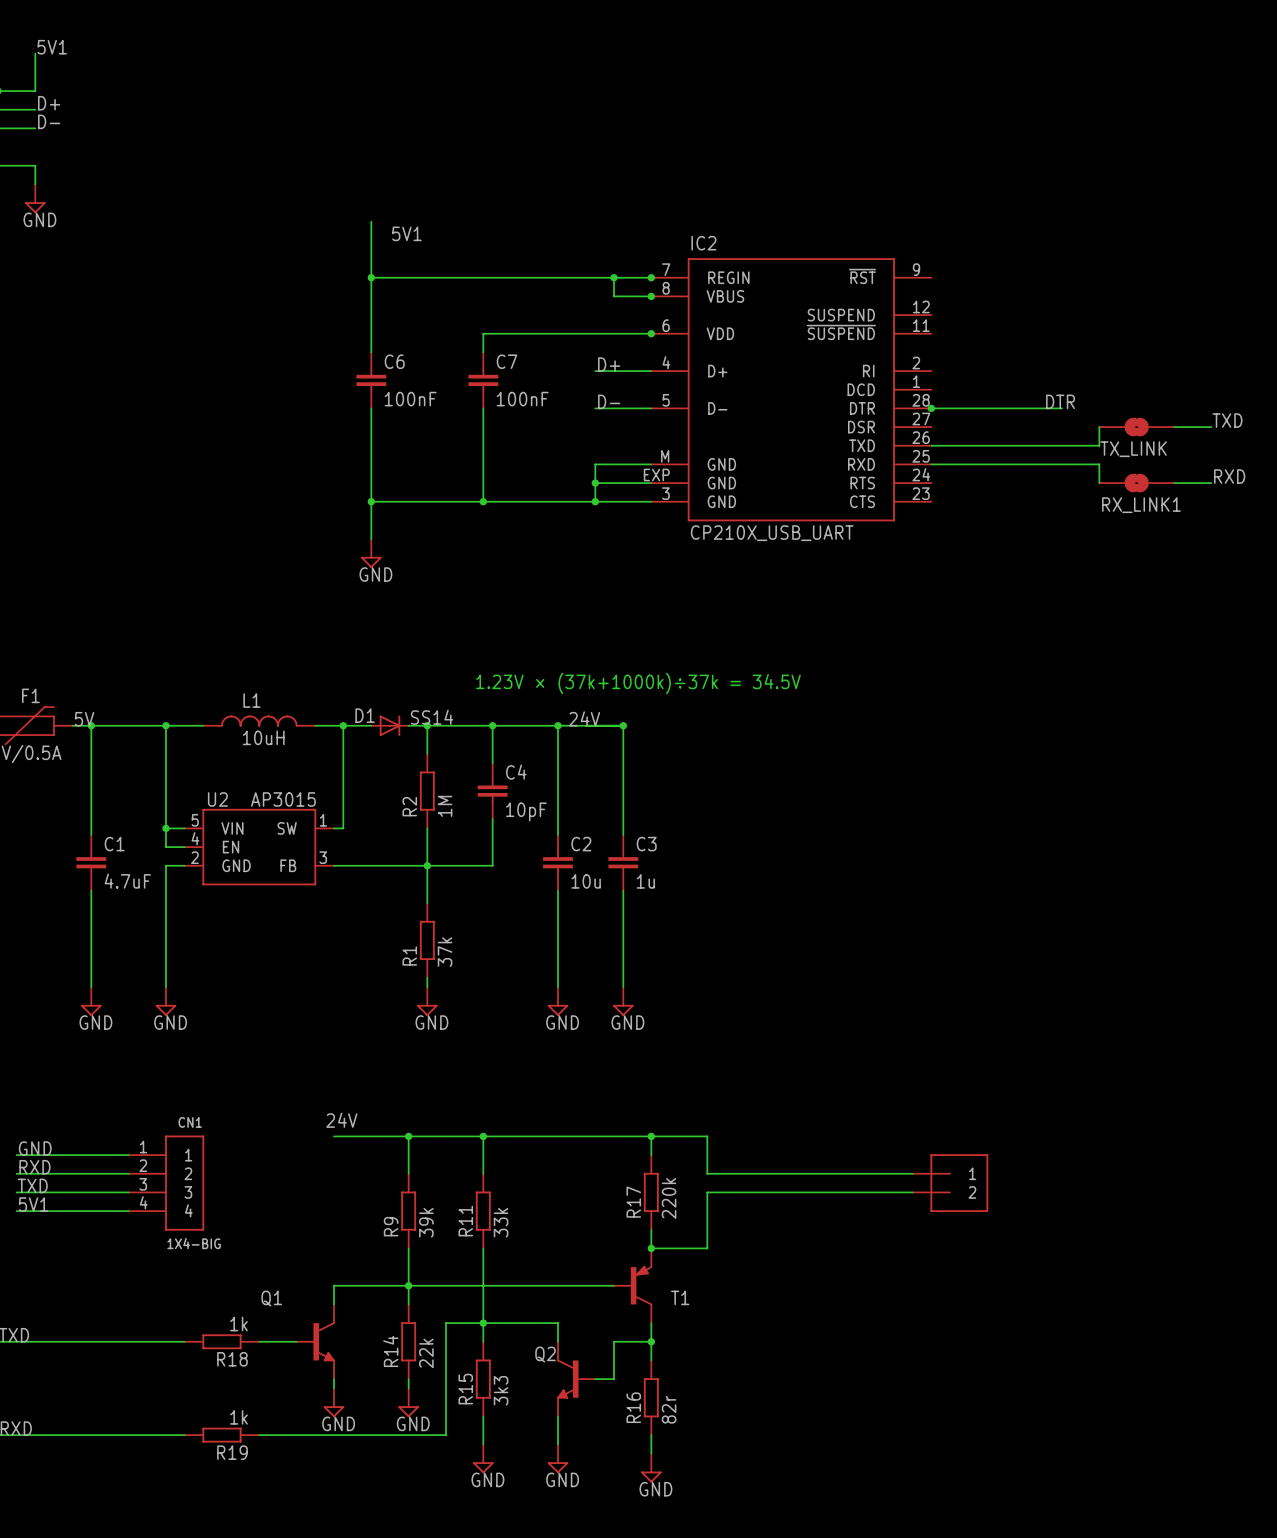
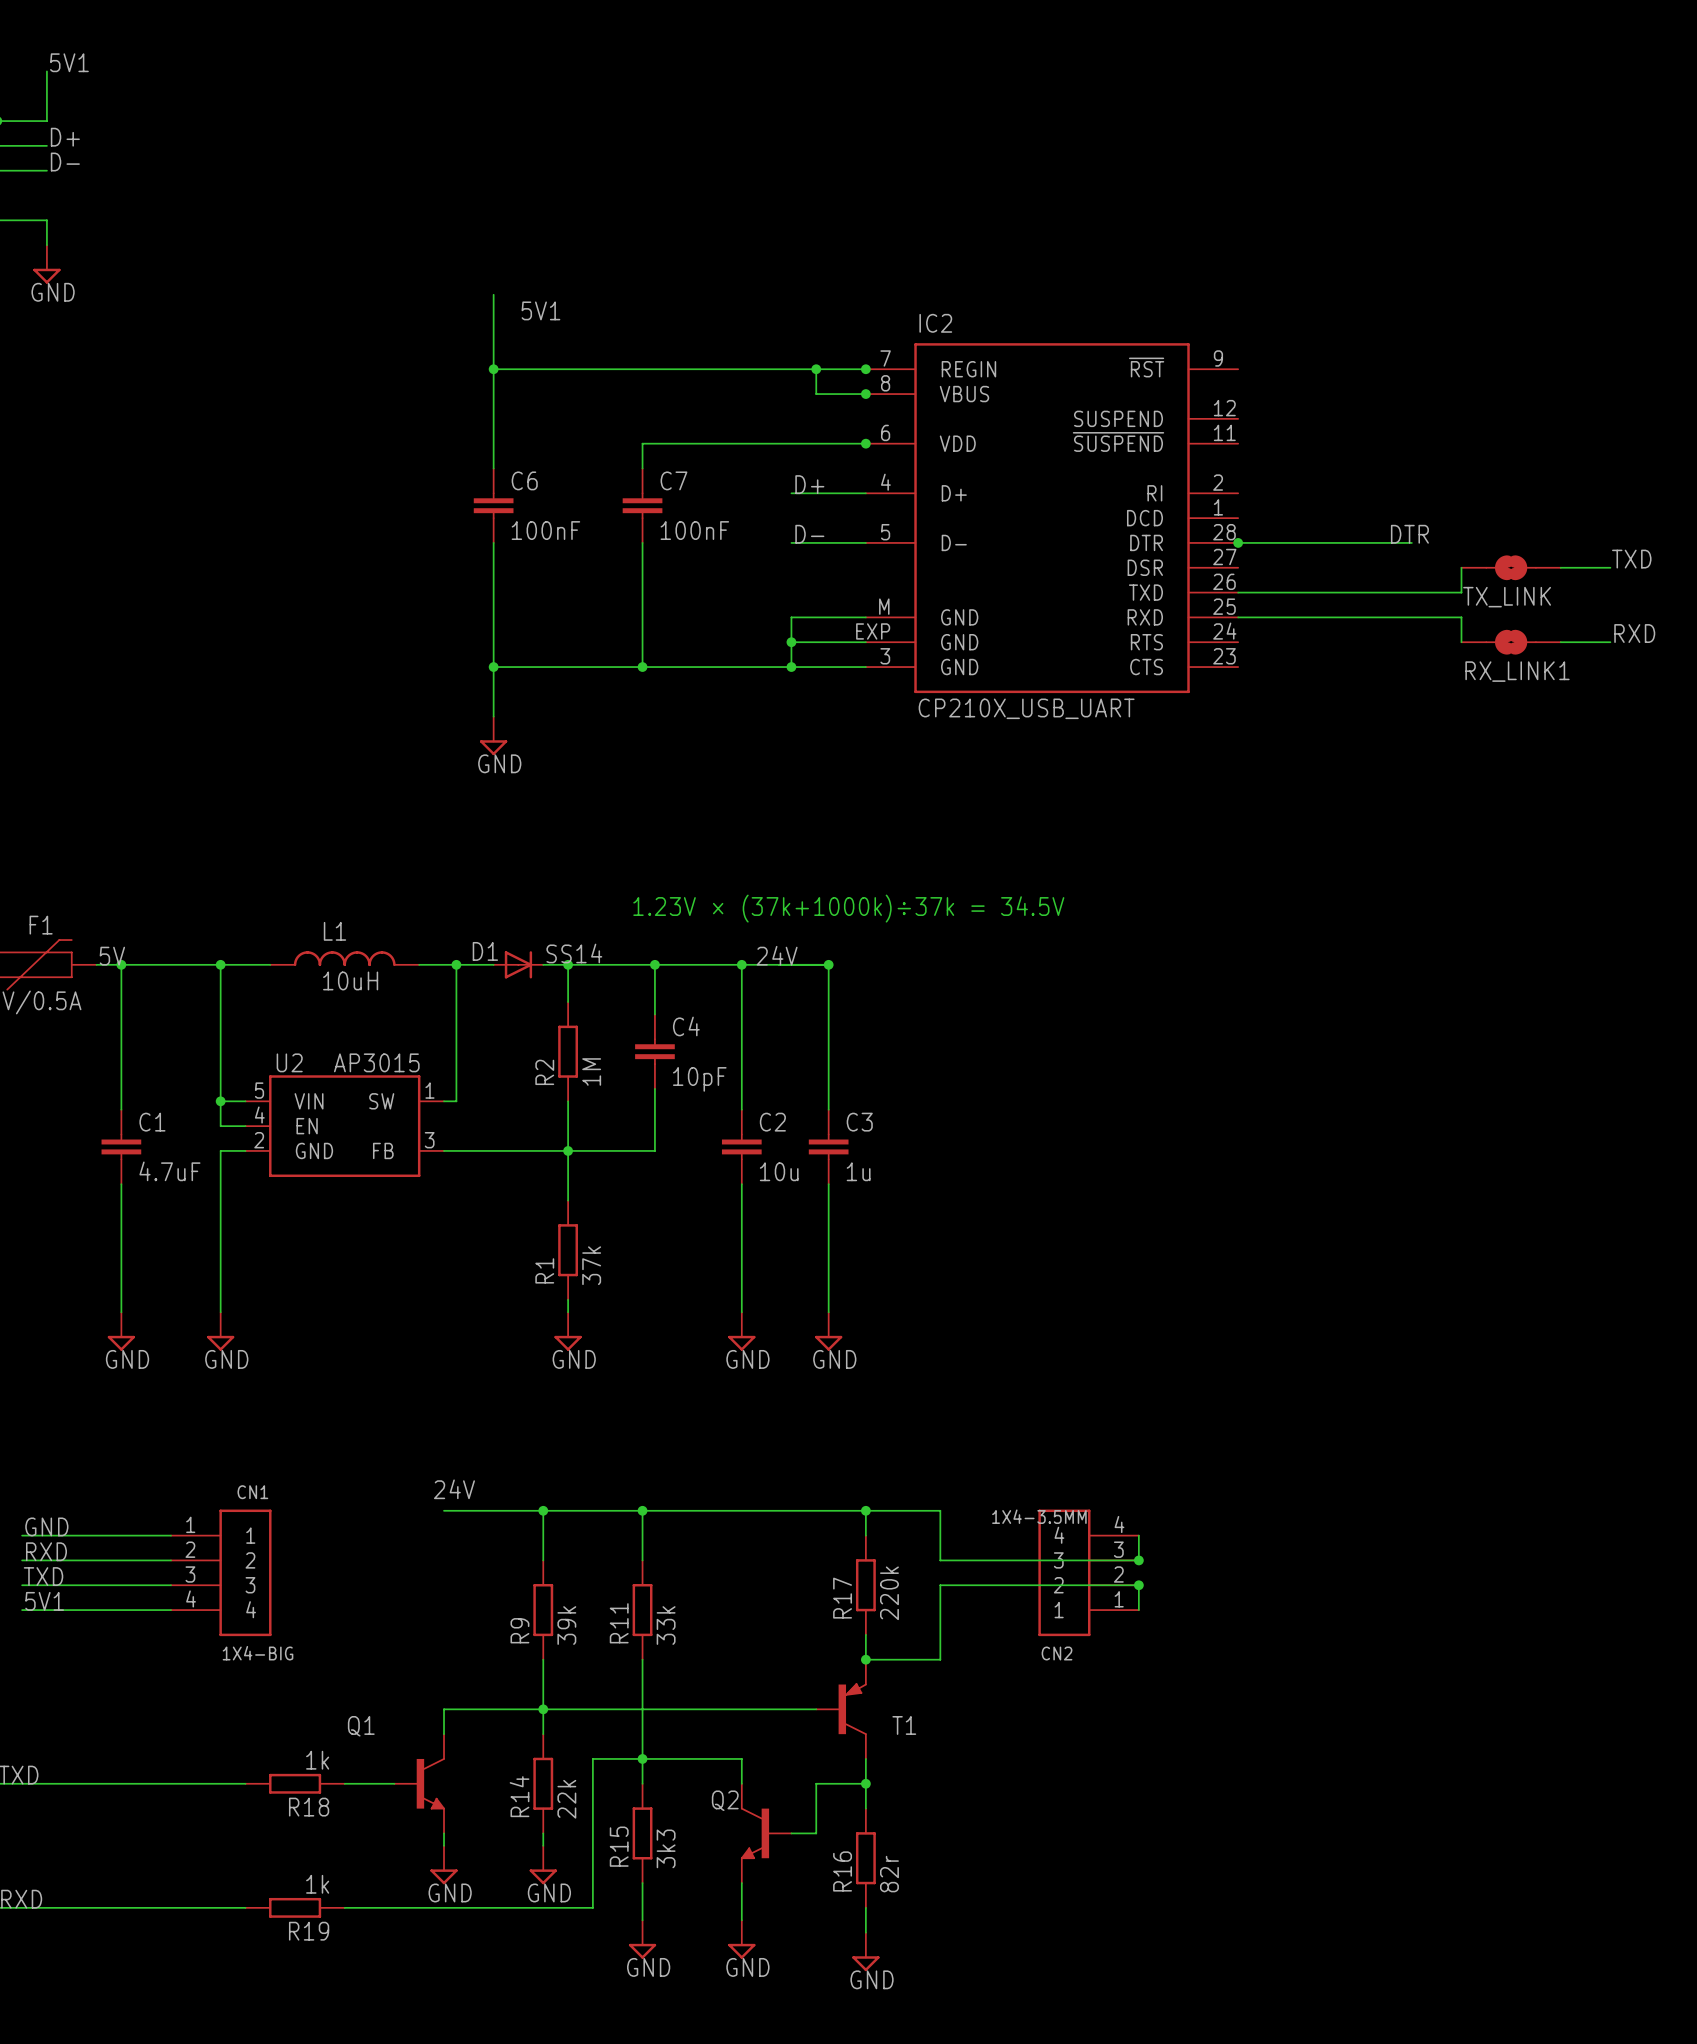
wire: (856, 1173) (912, 1173) -> (1138, 1560) (1138, 1535)
junction: none -> (1138, 1560)
CN2: none -> 1X4-3.5MM (1088, 1572)
part: (950, 1183) -> none
wire: (856, 1192) (912, 1192) -> (1138, 1585) (1138, 1610)
junction: none -> (1138, 1585)

